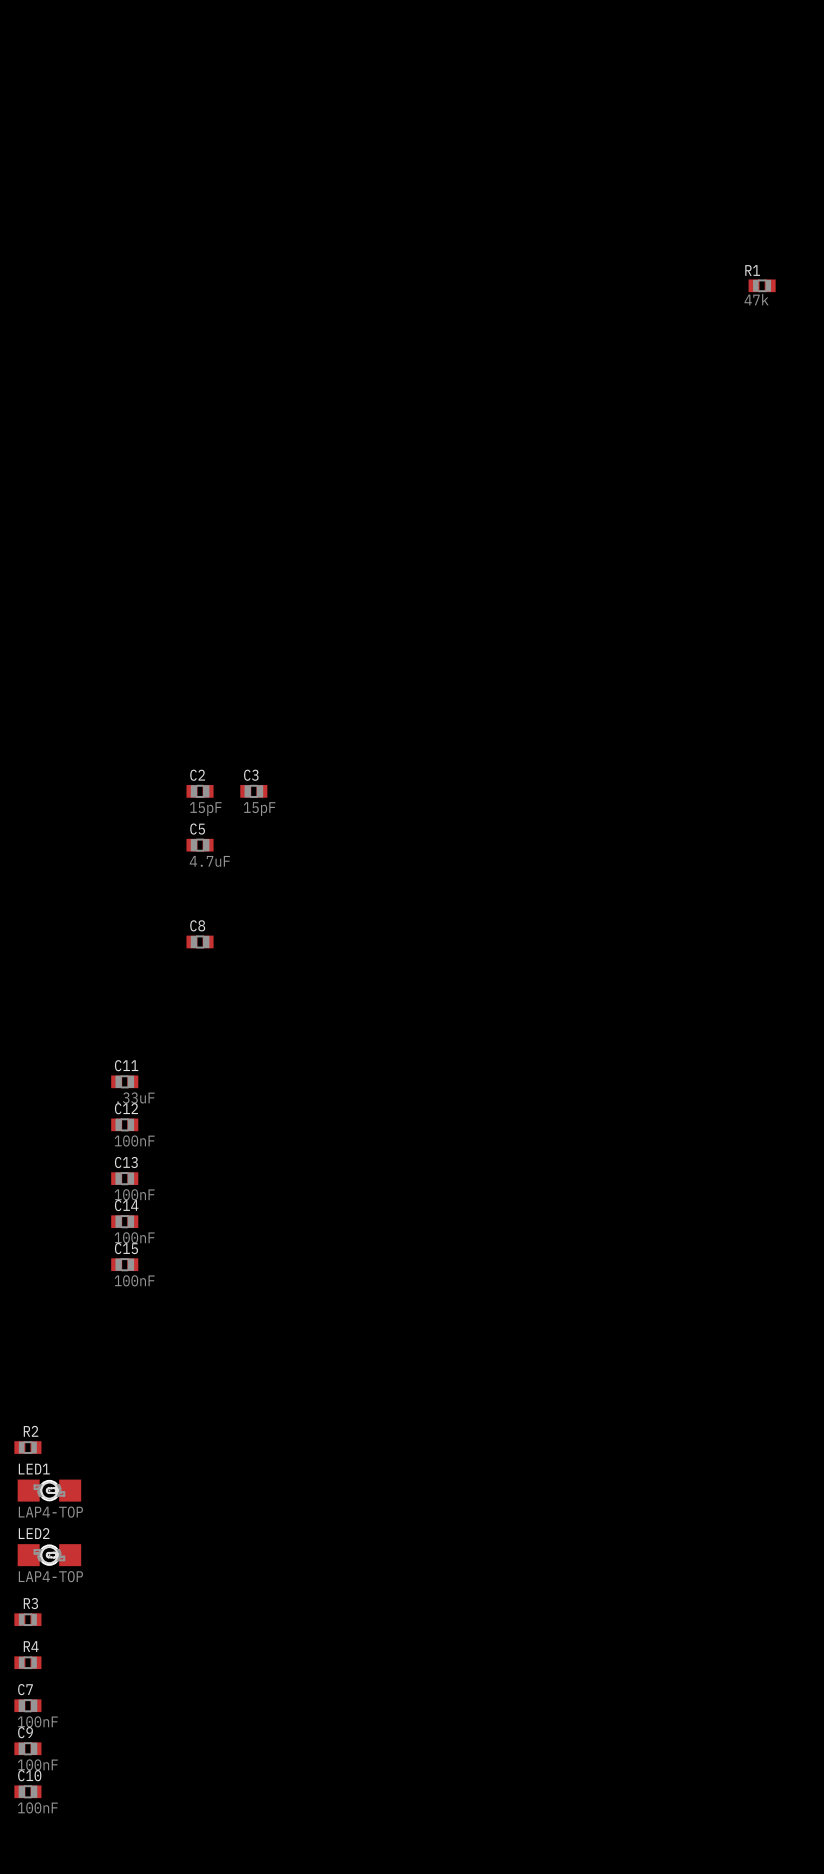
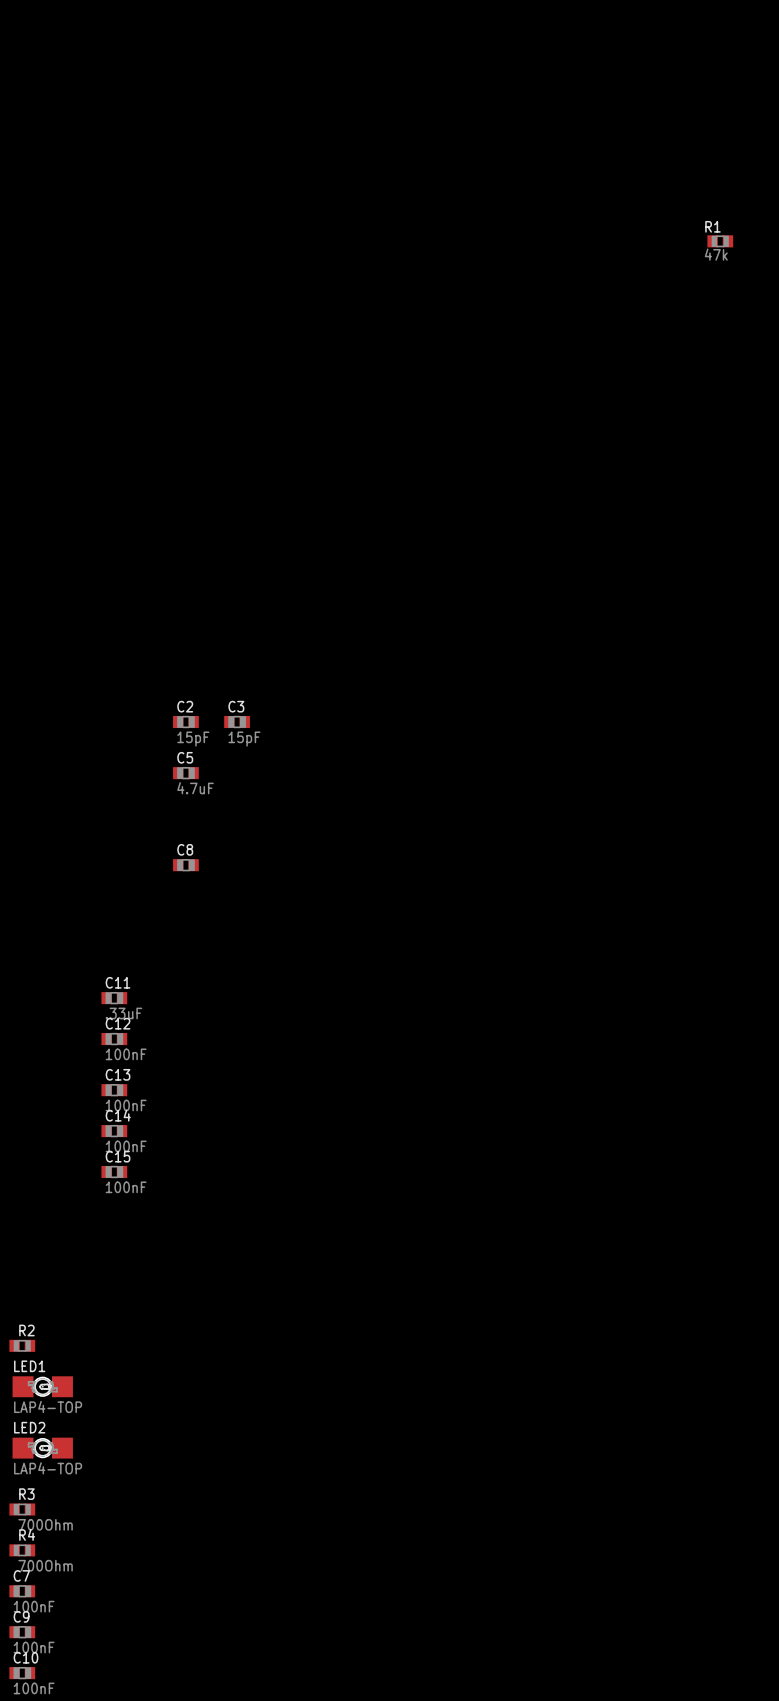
R3 value: none -> 700Ohm (45, 1524)
R4 value: none -> 700Ohm (45, 1565)

